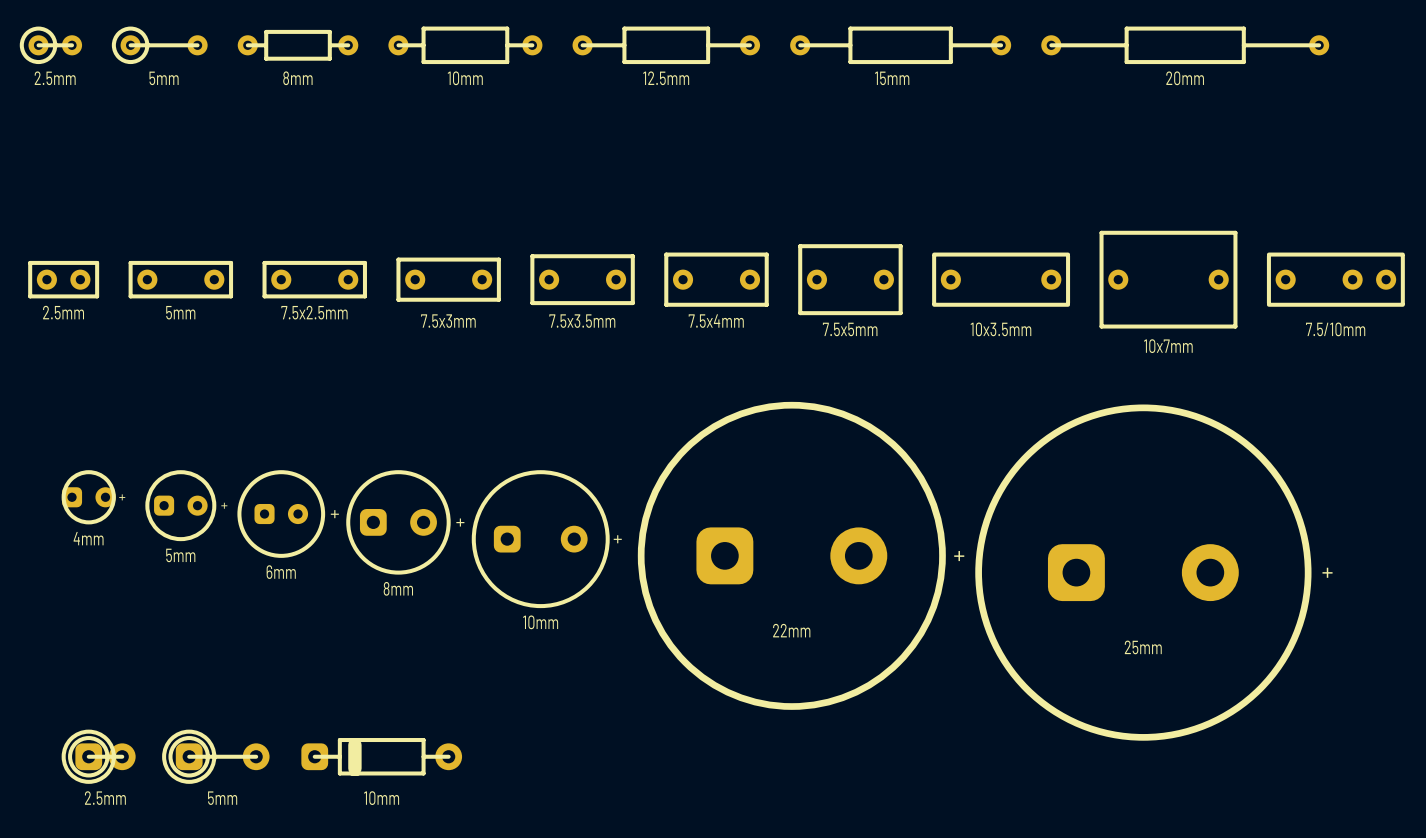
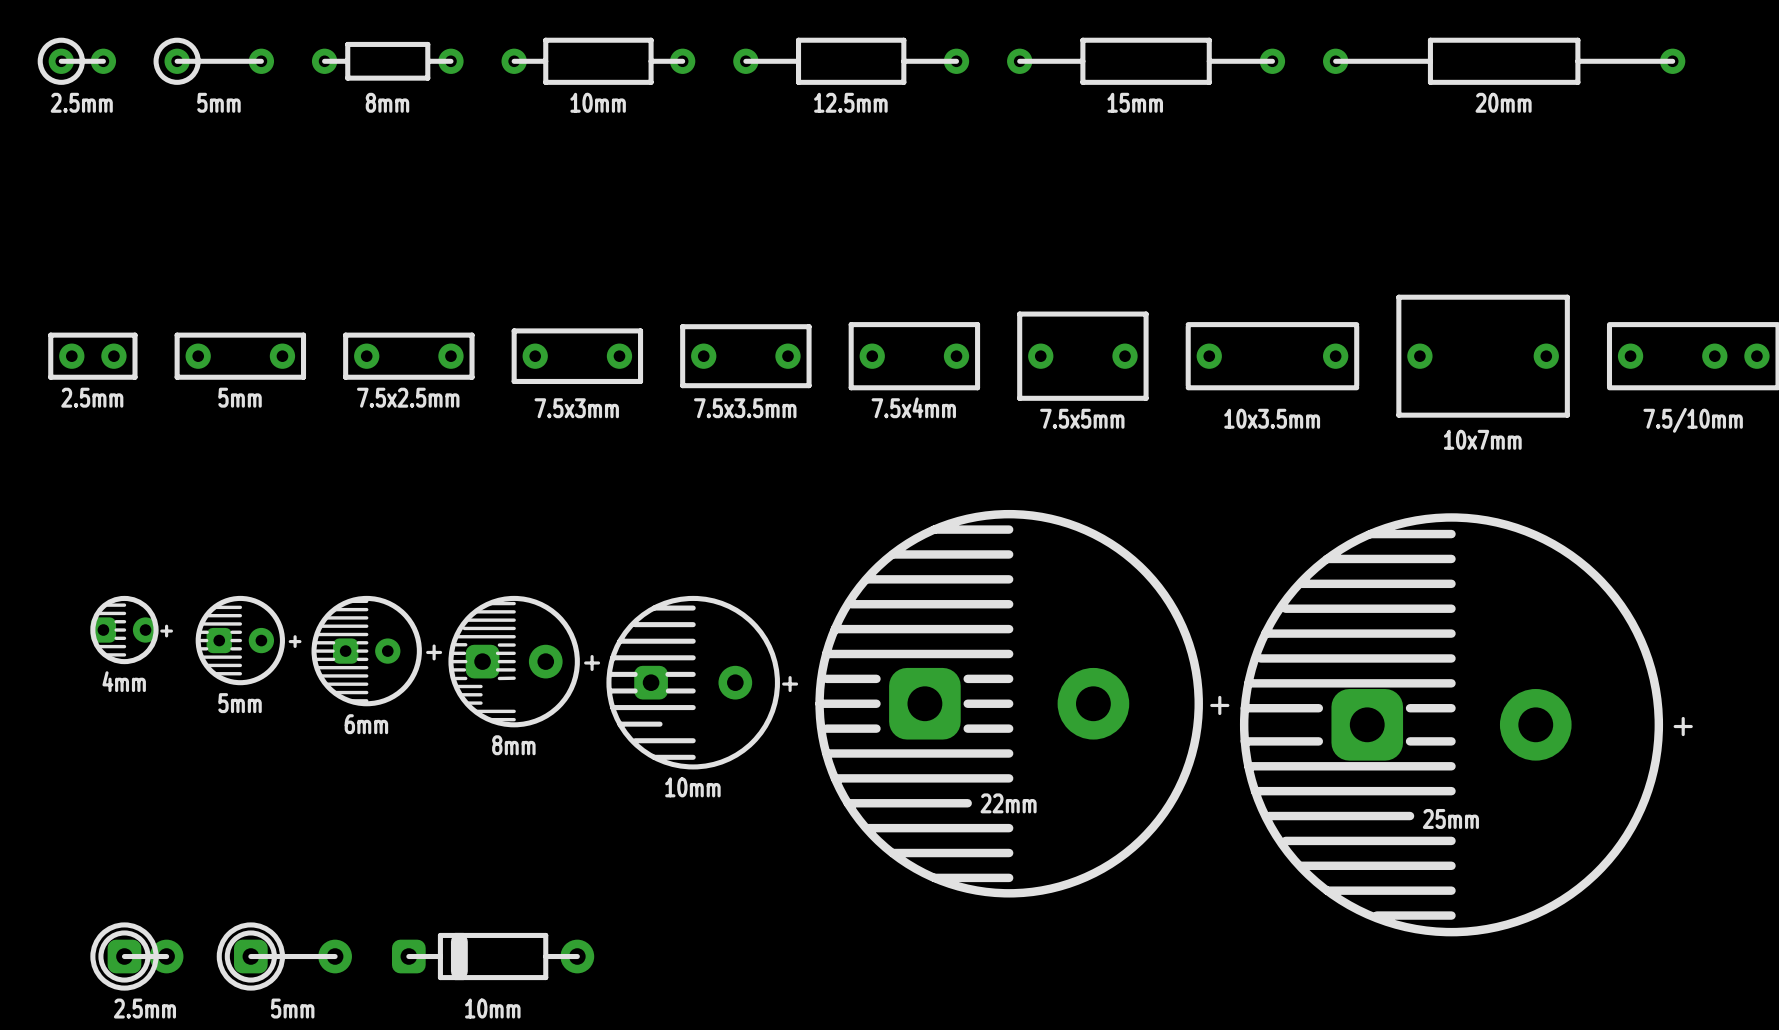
22mm footprint: [637, 401, 946, 710] -> [815, 509, 1203, 898]
25mm footprint: [975, 404, 1312, 741] -> [1239, 513, 1664, 937]
4mm footprint: [61, 470, 116, 525] -> [90, 595, 159, 665]
5mm footprint: [145, 470, 217, 542] -> [195, 595, 285, 686]
6mm footprint: [237, 470, 326, 558] -> [311, 595, 422, 707]
8mm footprint: [346, 470, 451, 575] -> [448, 595, 580, 728]
10mm footprint: [471, 470, 610, 609] -> [606, 595, 780, 770]

